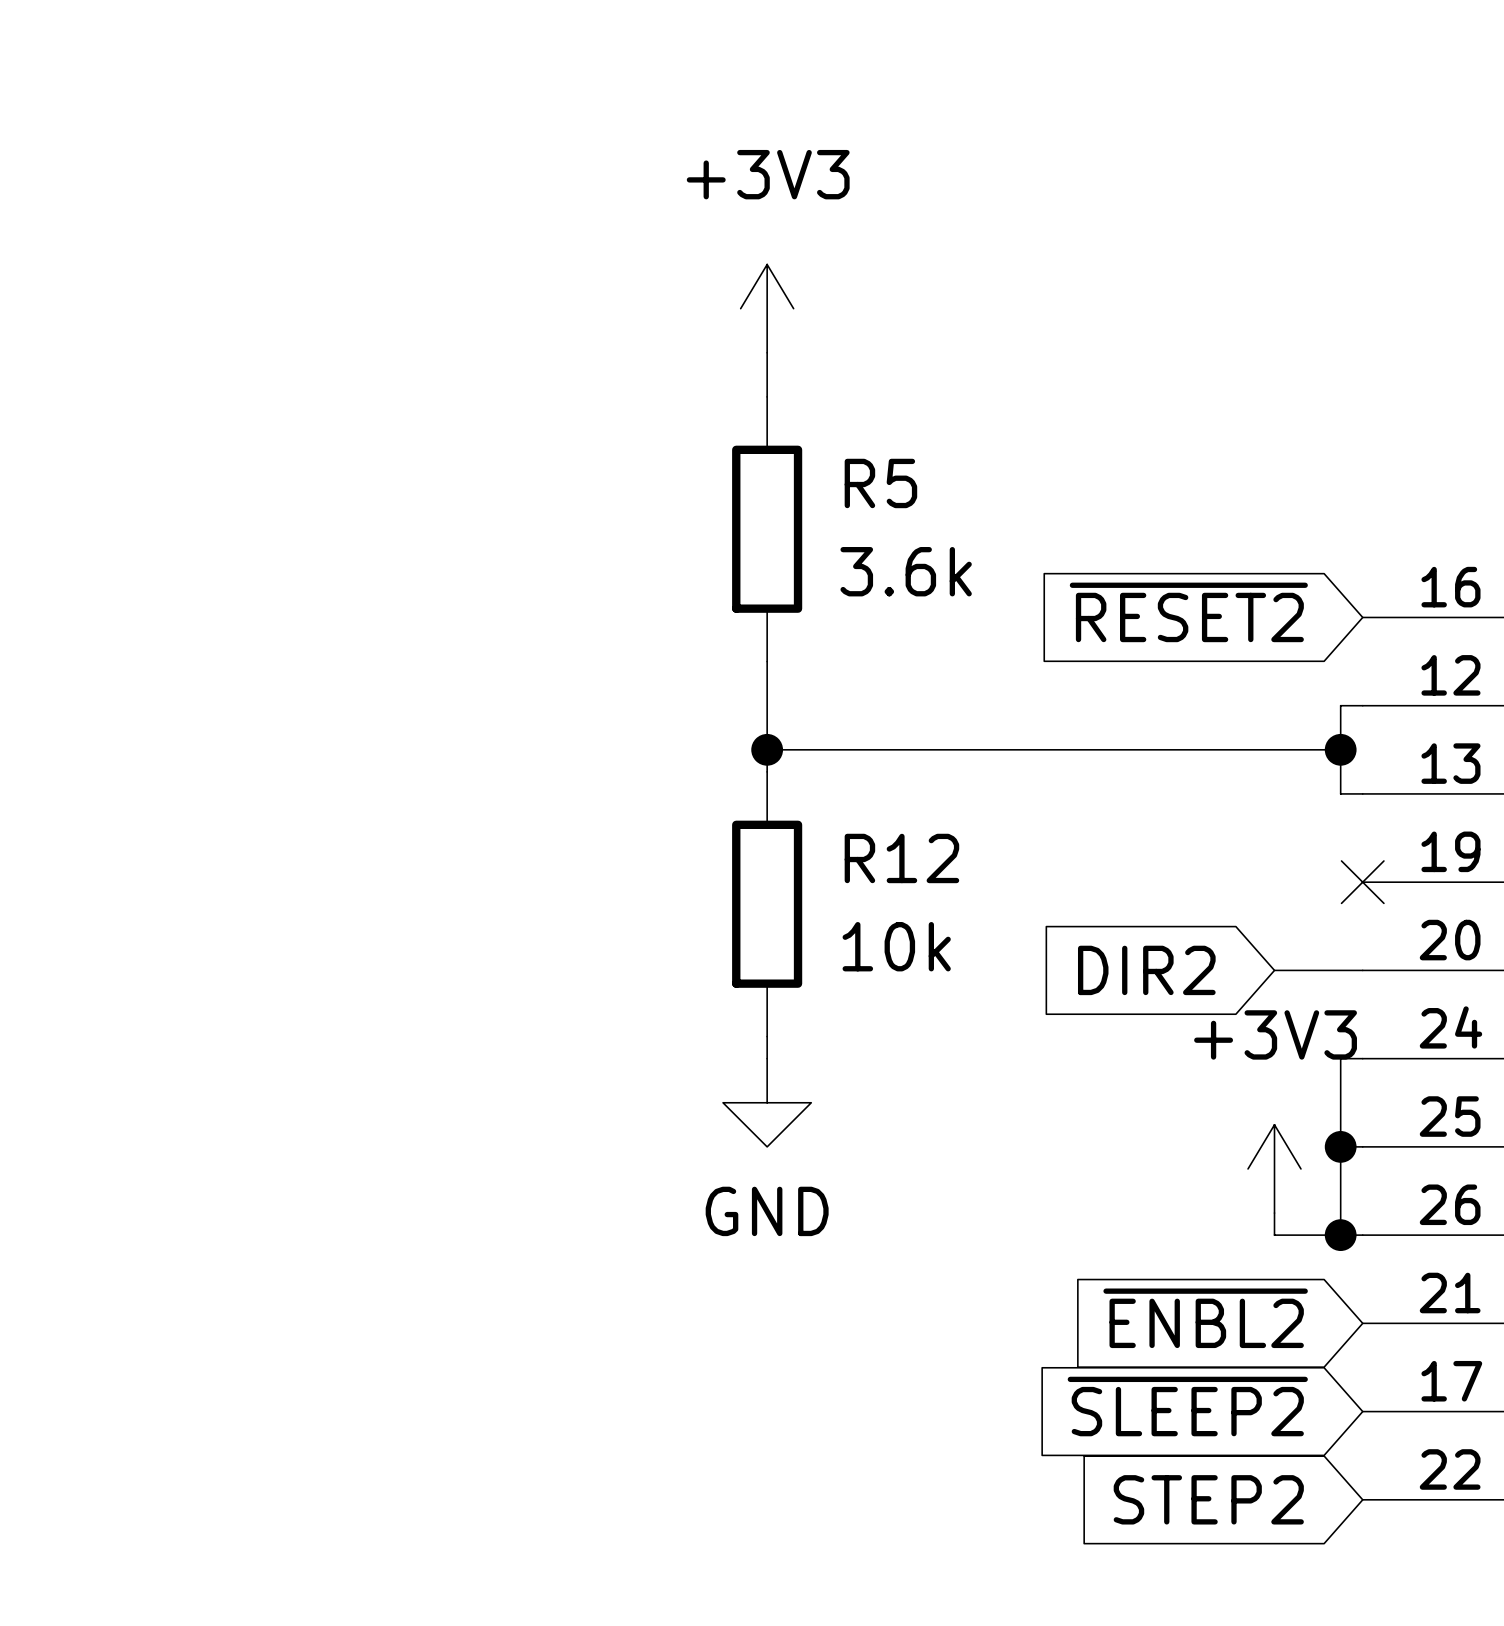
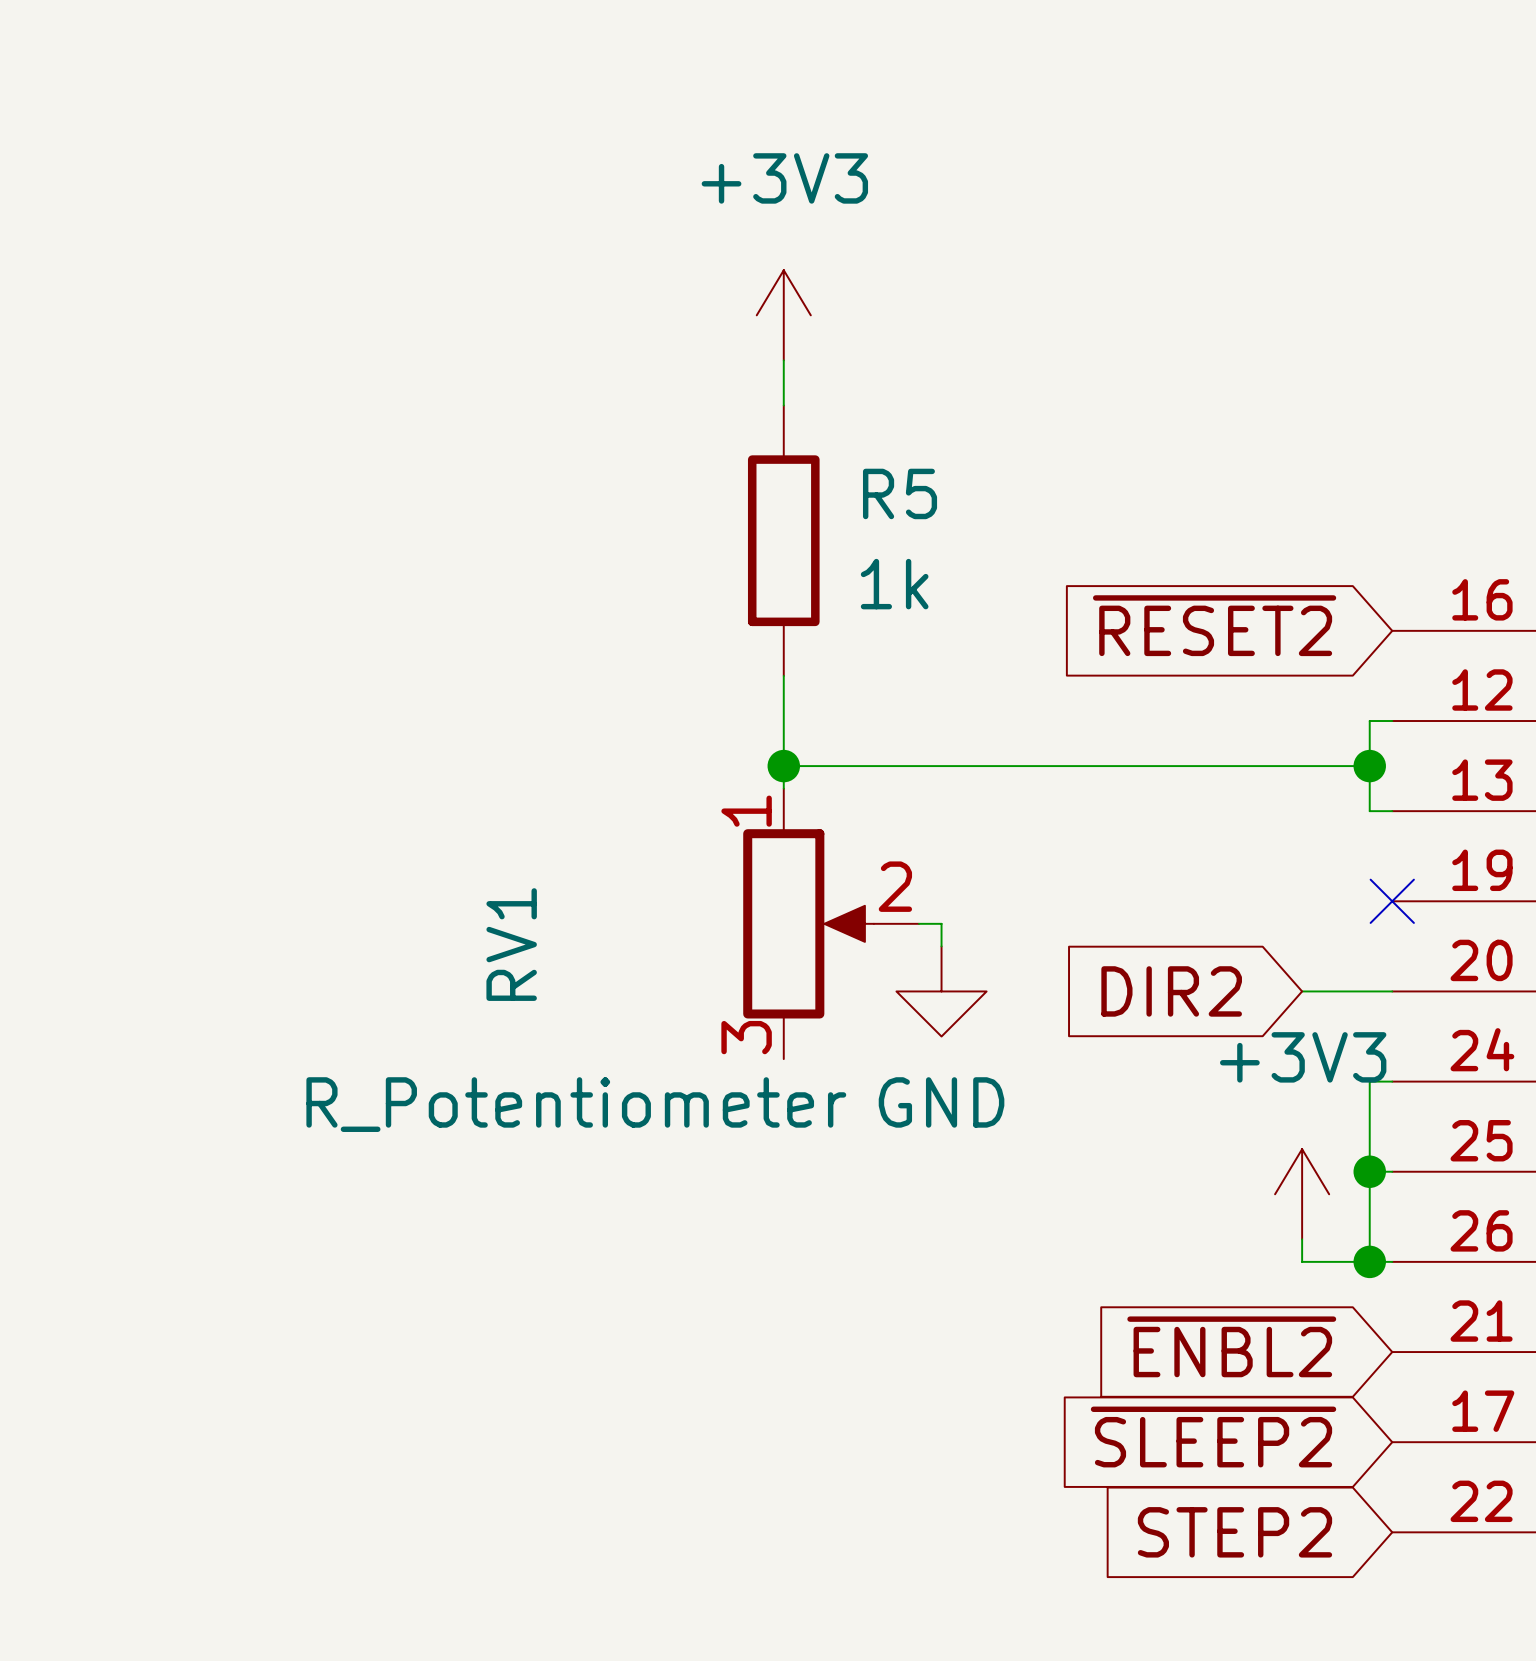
R5 value: 3.6k (906, 571) -> 1k (894, 584)
R12: 10k (767, 904) -> none
RV1: none -> R_Potentiometer (831, 923)
wire: none -> (919, 923) (941, 923) (941, 946)
wire: (767, 1036) (767, 1058) -> none
power symbol position: GND (767, 1102) -> GND (941, 991)

